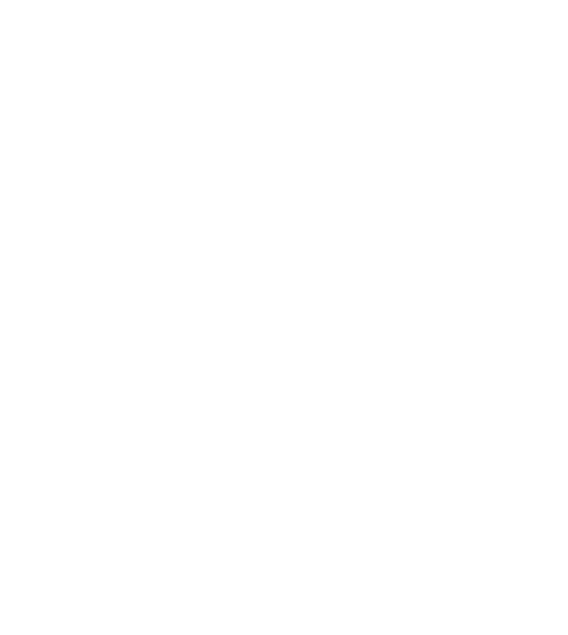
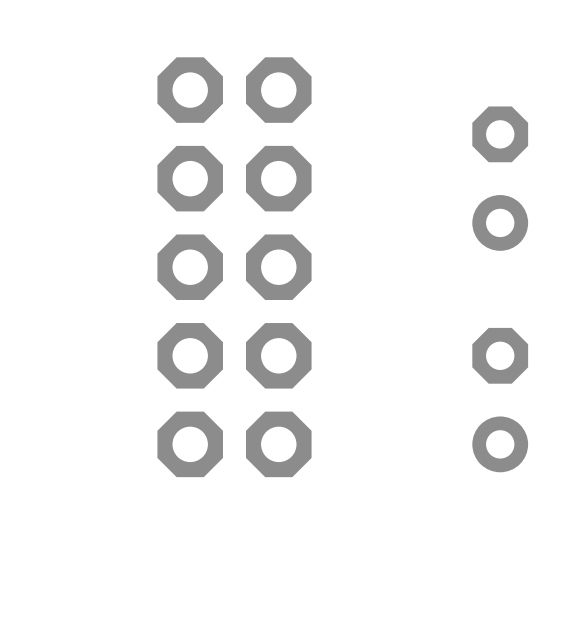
part: none -> (500, 178)
part: none -> (234, 267)
part: none -> (500, 400)

